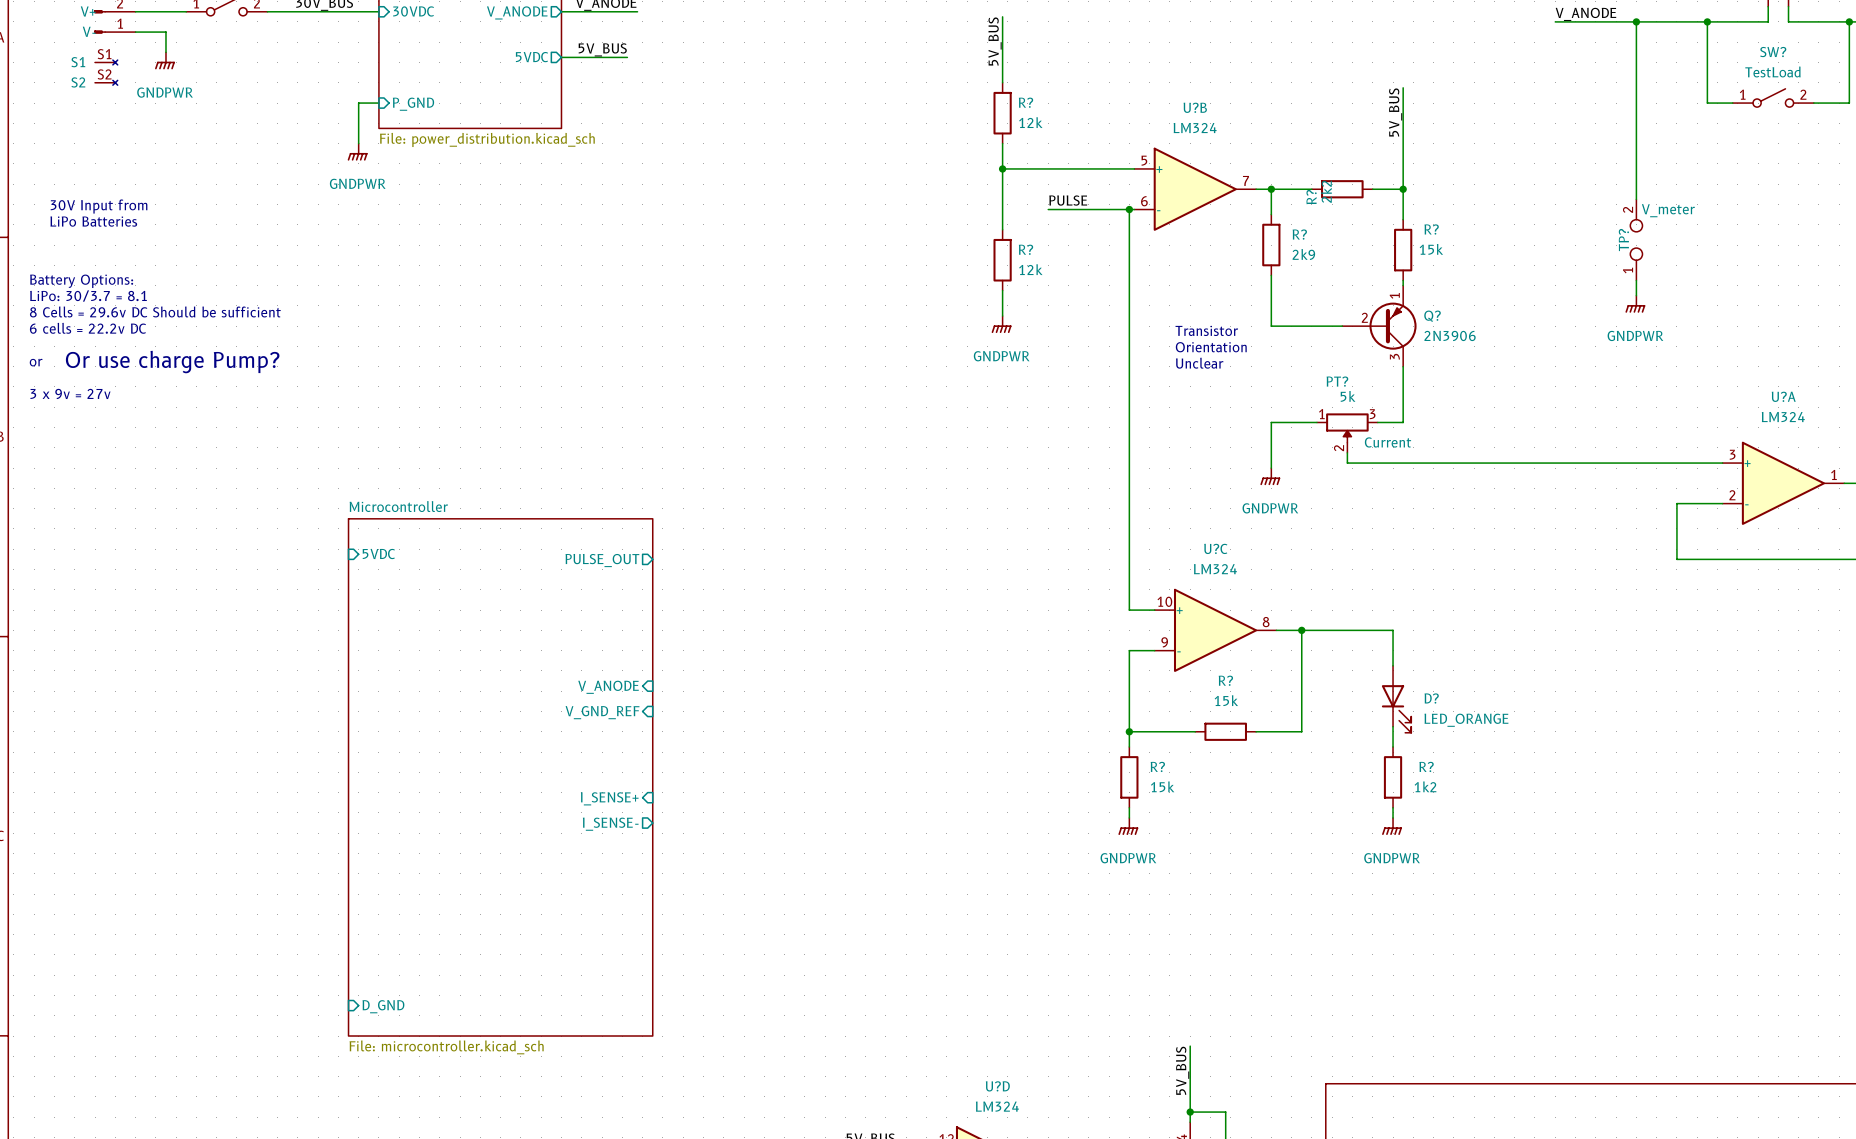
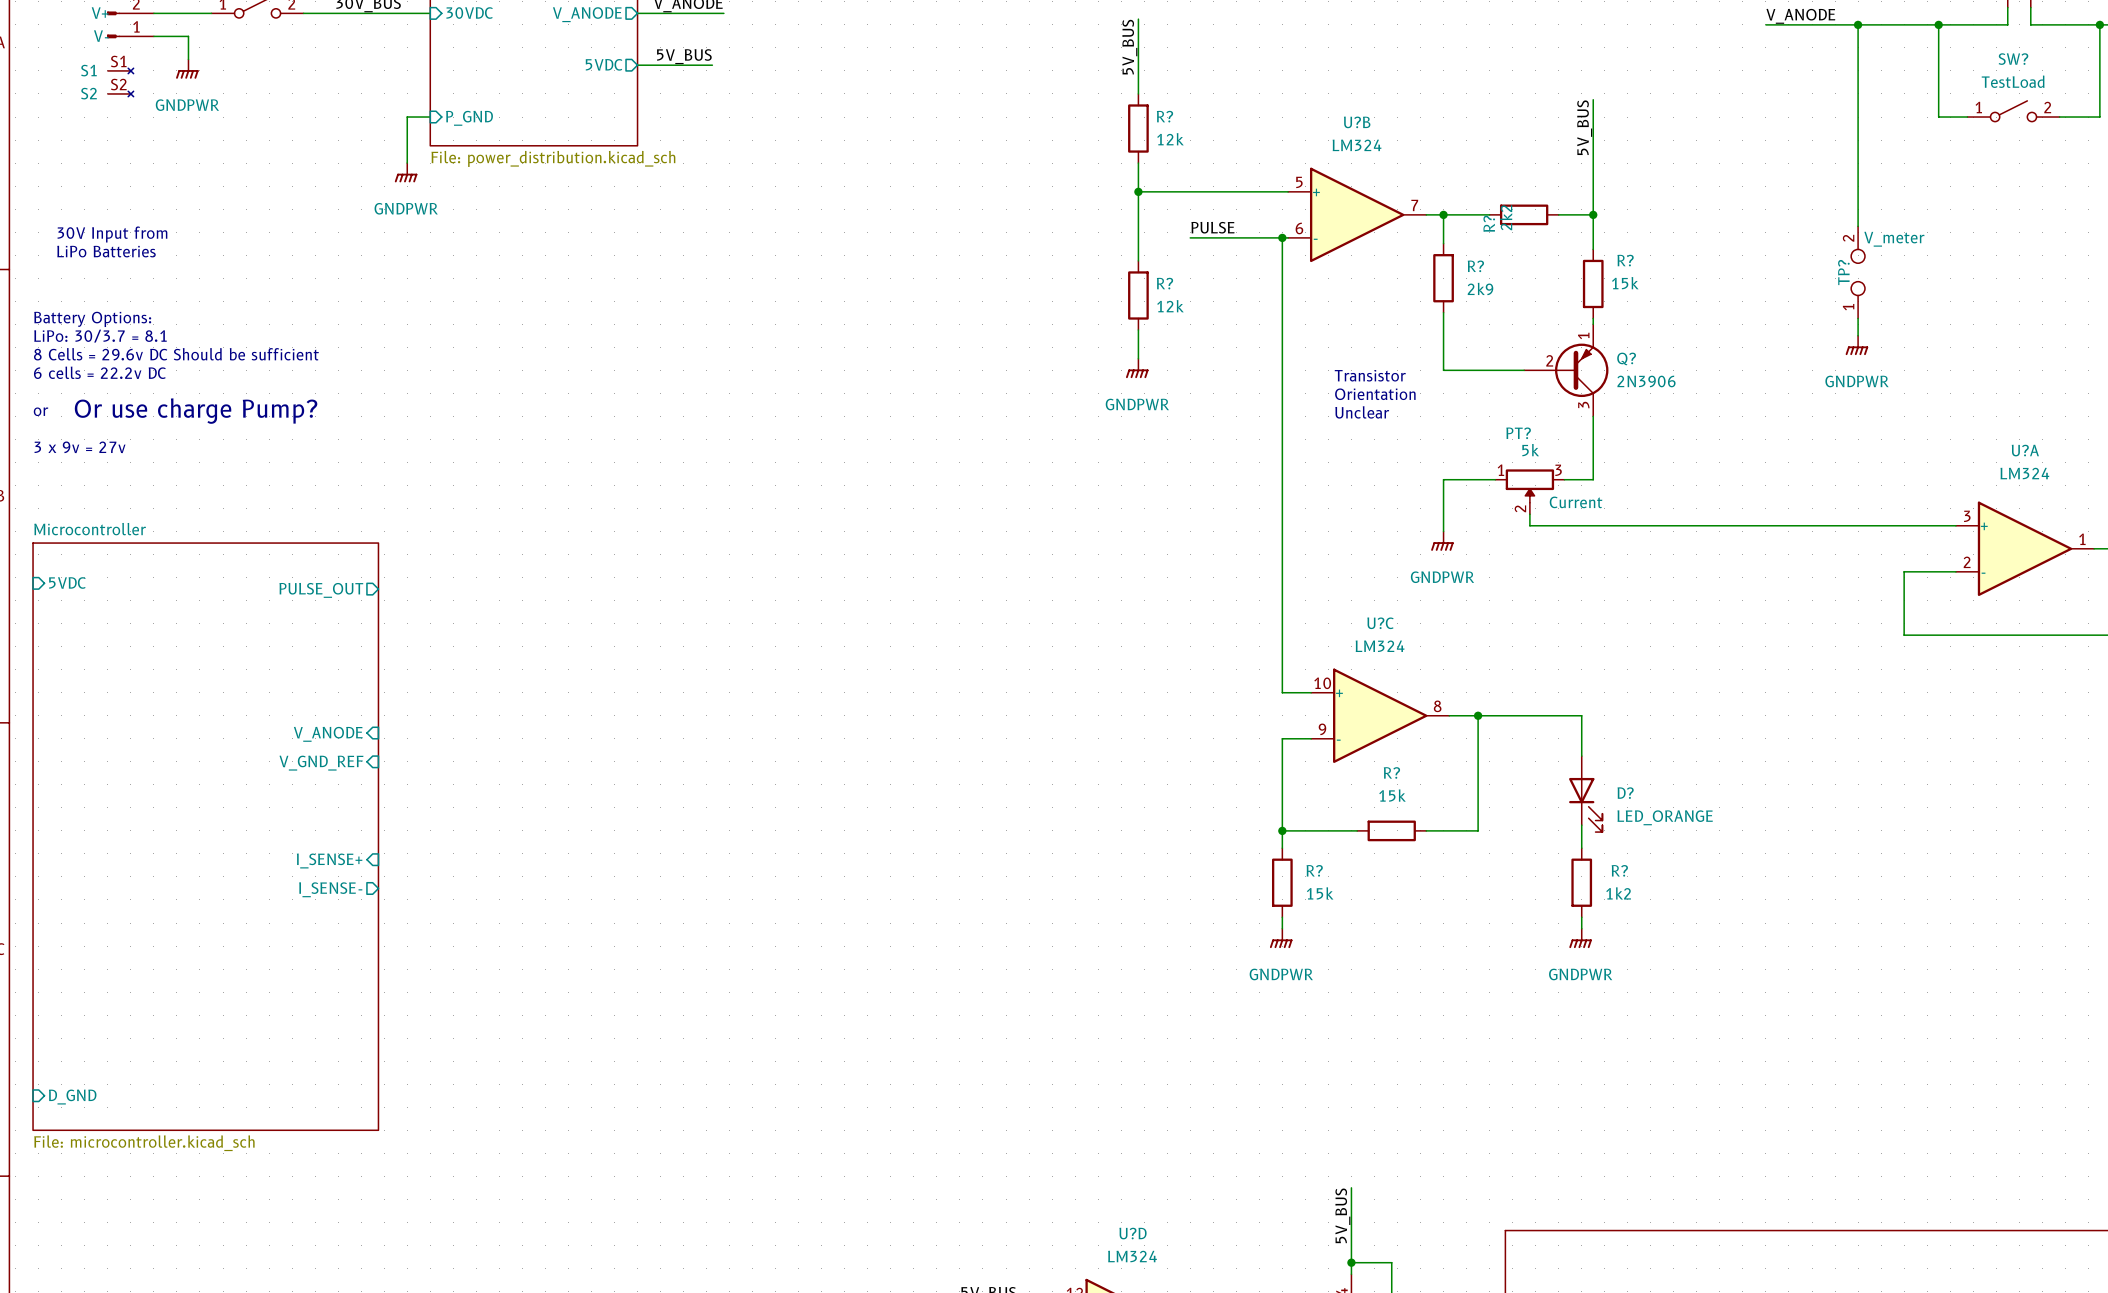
sheet pin: none -> 5VDC (67, 582)
sheet pin: none -> PULSE_OUT (321, 590)
sheet pin: 5VDC (378, 554) -> none
sheet pin: PULSE_OUT (602, 560) -> none
sheet pin: none -> V_ANODE (328, 734)
sheet pin: none -> V_GND_REF (321, 763)
sheet pin: V_ANODE (608, 687) -> none
sheet pin: V_GND_REF (602, 712) -> none
sheet Microcontroller: none -> File: microcontroller.kicad_sch (205, 836)
sheet pin: none -> I_SENSE+ (329, 860)
sheet Microcontroller: File: microcontroller.kicad_sch (500, 777) -> none
sheet pin: none -> I_SENSE- (330, 889)
sheet pin: I_SENSE+ (609, 798) -> none
sheet pin: I_SENSE- (610, 824) -> none
sheet pin: none -> D_GND (72, 1097)
sheet pin: D_GND (383, 1006) -> none

